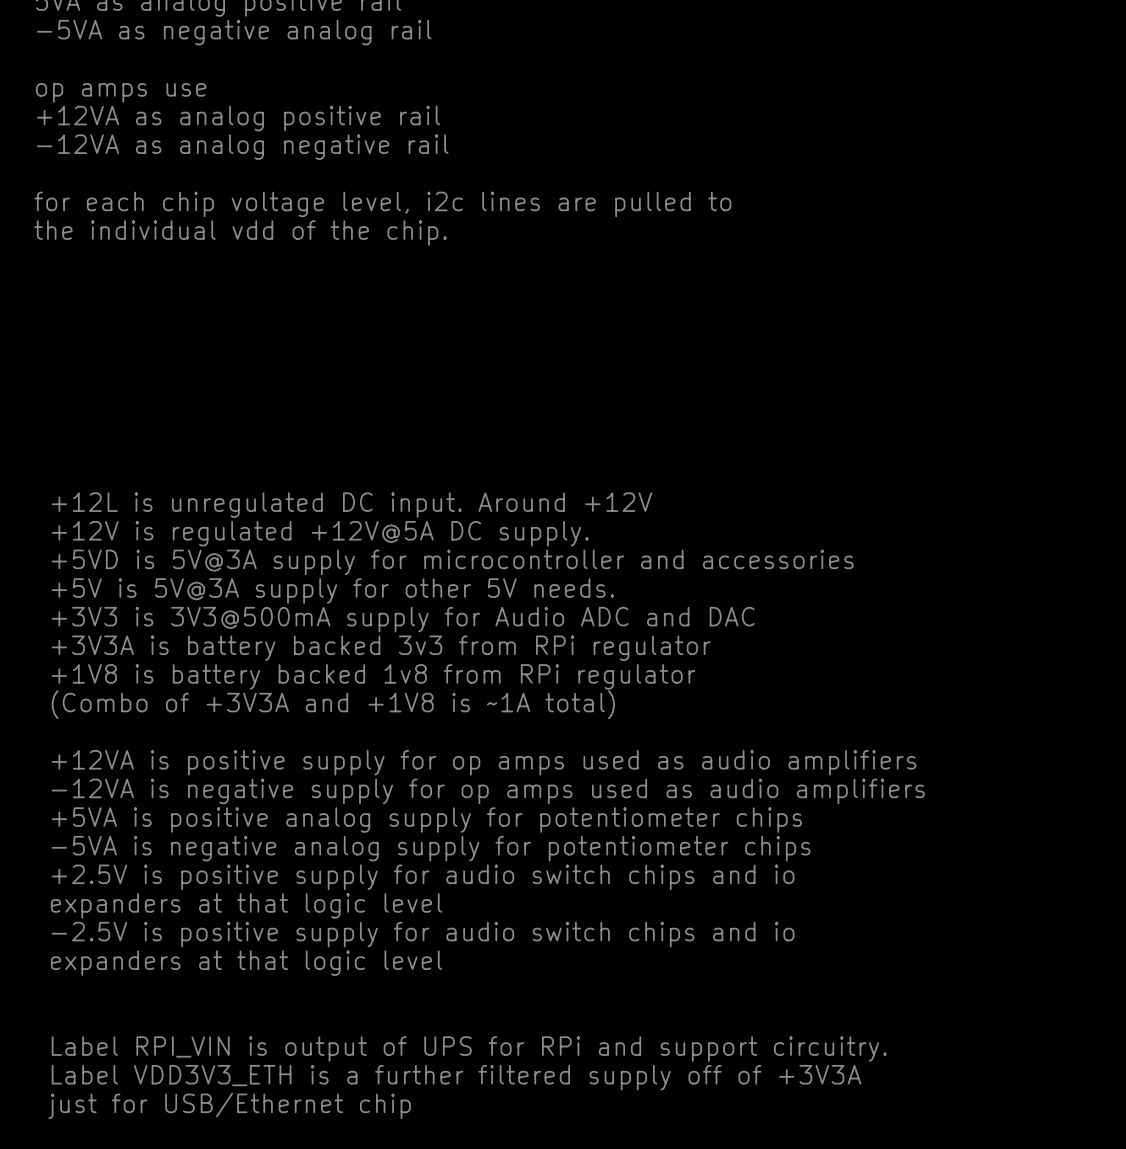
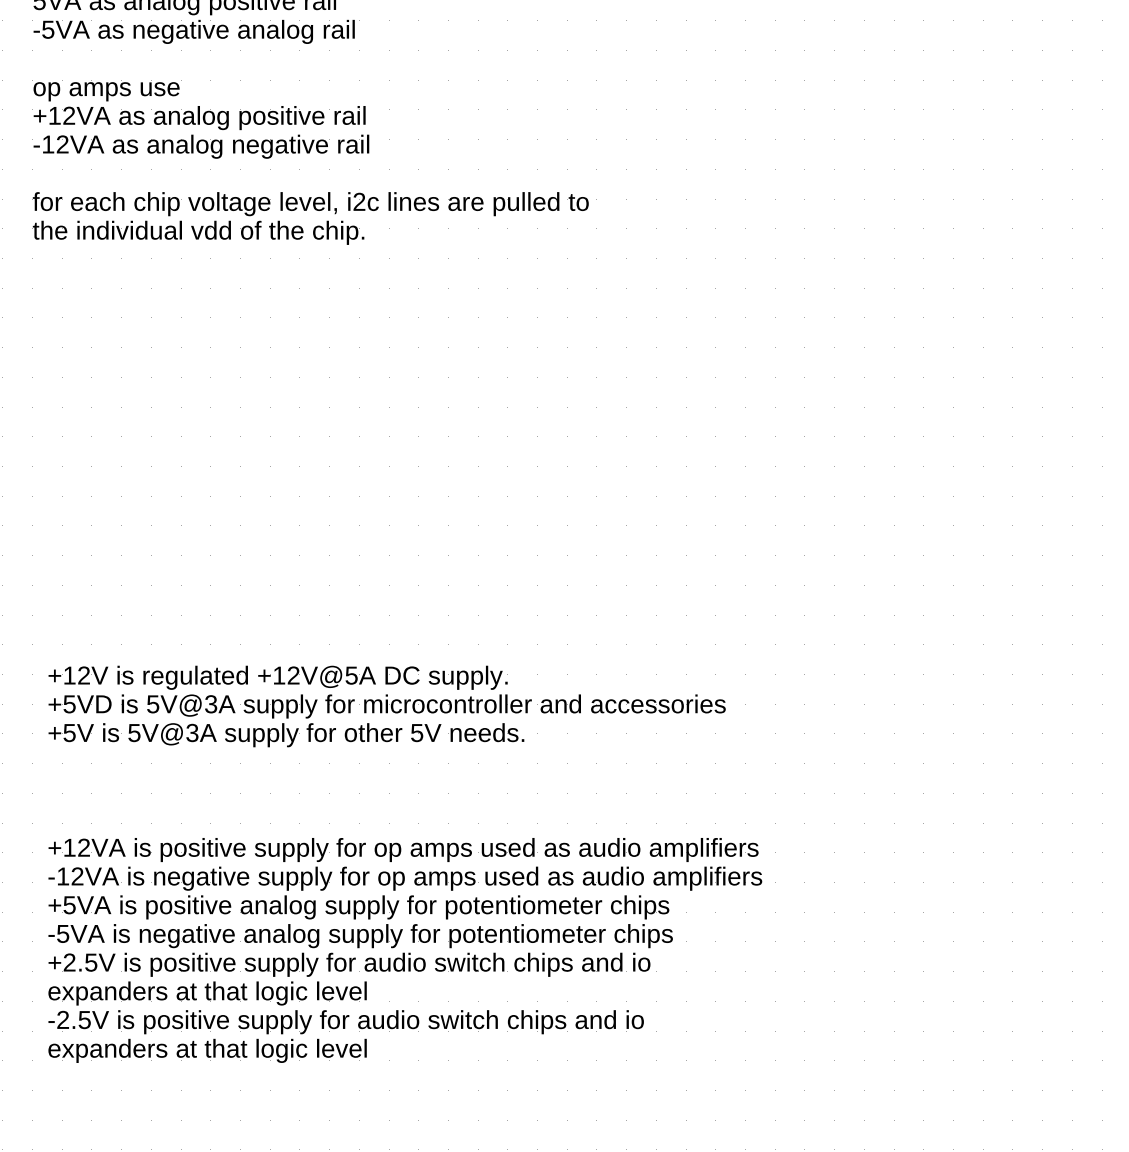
text: +12L is unregulated DC input. Around +12V (351, 505) -> none
text: +12V is regulated +12V@5A DC supply. (320, 533) -> none
text: +5VD is 5V@3A supply for microcontroller and accessories (452, 562) -> none
text position: +5V is 5V@3A supply for other 5V needs. (332, 590) -> +5V is 5V@3A supply for other 5V needs. (286, 735)
text: +3V3 is 3V3@500mA supply for Audio ADC and DAC (403, 619) -> none
text: +3V3A is battery backed 3v3 from RPi regulator (381, 648) -> none
text: +1V8 is battery backed 1v8 from RPi regulator (373, 676) -> +12V is regulated +12V@5A DC supply. (278, 677)
text: (Combo of +3V3A and +1V8 is ~1A total) (333, 704) -> +5VD is 5V@3A supply for microcontroller and accessories (387, 706)
text: +12VA is positive supply for op amps used as audio amplifiers (484, 762) -> none
text: -12VA is negative supply for op amps used as audio amplifiers (488, 791) -> none
text: +5VA is positive analog supply for potentiometer chips (426, 820) -> none
text: -5VA is negative analog supply for potentiometer chips (431, 848) -> +12VA is positive supply for op amps used as audio amplifiers (403, 850)
text: +2.5V is positive supply for audio switch chips and io (423, 877) -> -12VA is negative supply for op amps used as audio amplifiers (405, 878)
text: expanders at that logic level (246, 905) -> +5VA is positive analog supply for potentiometer chips (358, 907)
text: -2.5V is positive supply for audio switch chips and io (423, 934) -> -5VA is negative analog supply for potentiometer chips (360, 936)
text: expanders at that logic level (246, 963) -> +2.5V is positive supply for audio switch chips and io (349, 964)
text: none -> expanders at that logic level (207, 993)
text: none -> -2.5V is positive supply for audio switch chips and io (346, 1022)
text: Label RPI_VIN is output of UPS for RPi and support circuitry. (469, 1049) -> expanders at that logic level (207, 1050)
text: Label VDD3V3_ETH is a further filtered supply off of +3V3A (456, 1077) -> none
text: just for USB/Ethernet chip (229, 1105) -> none

